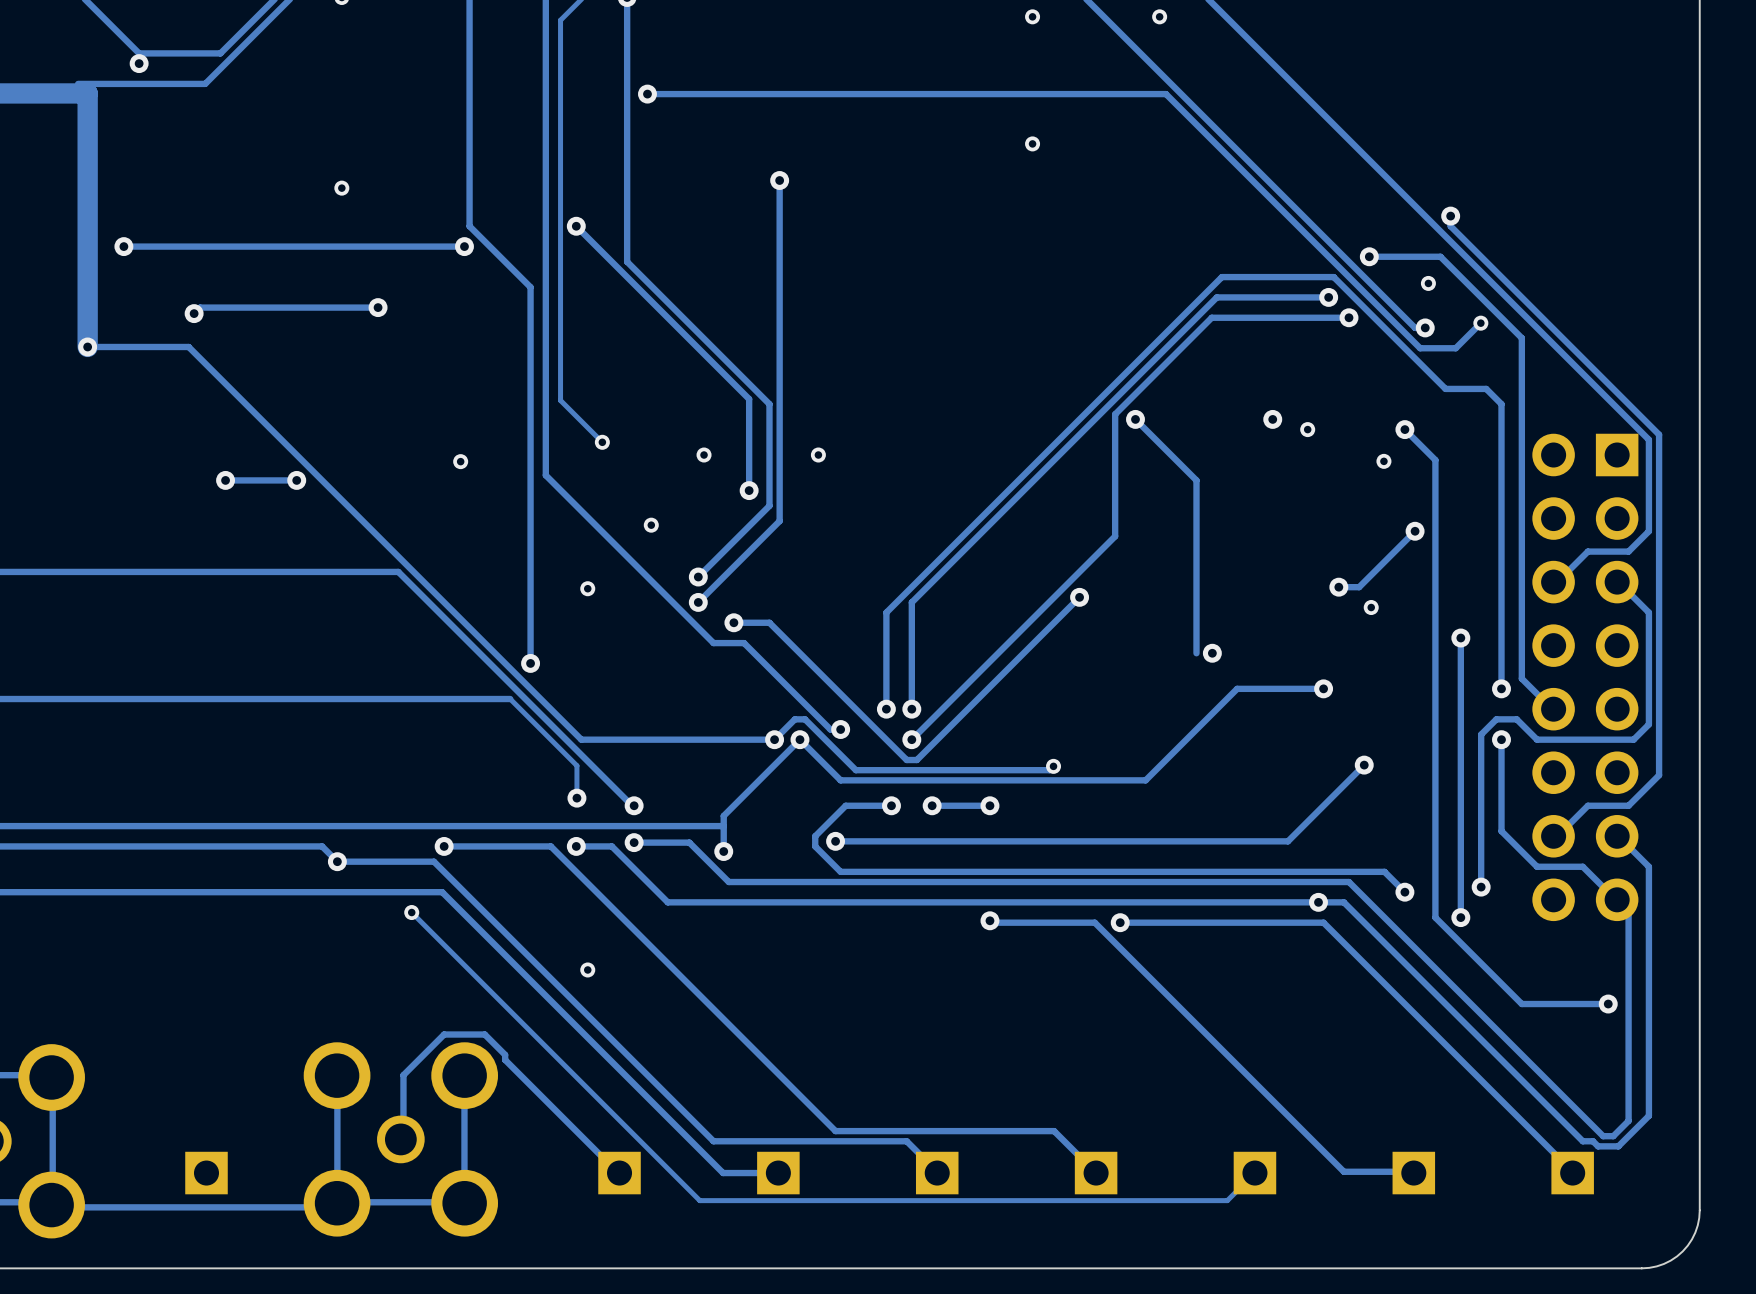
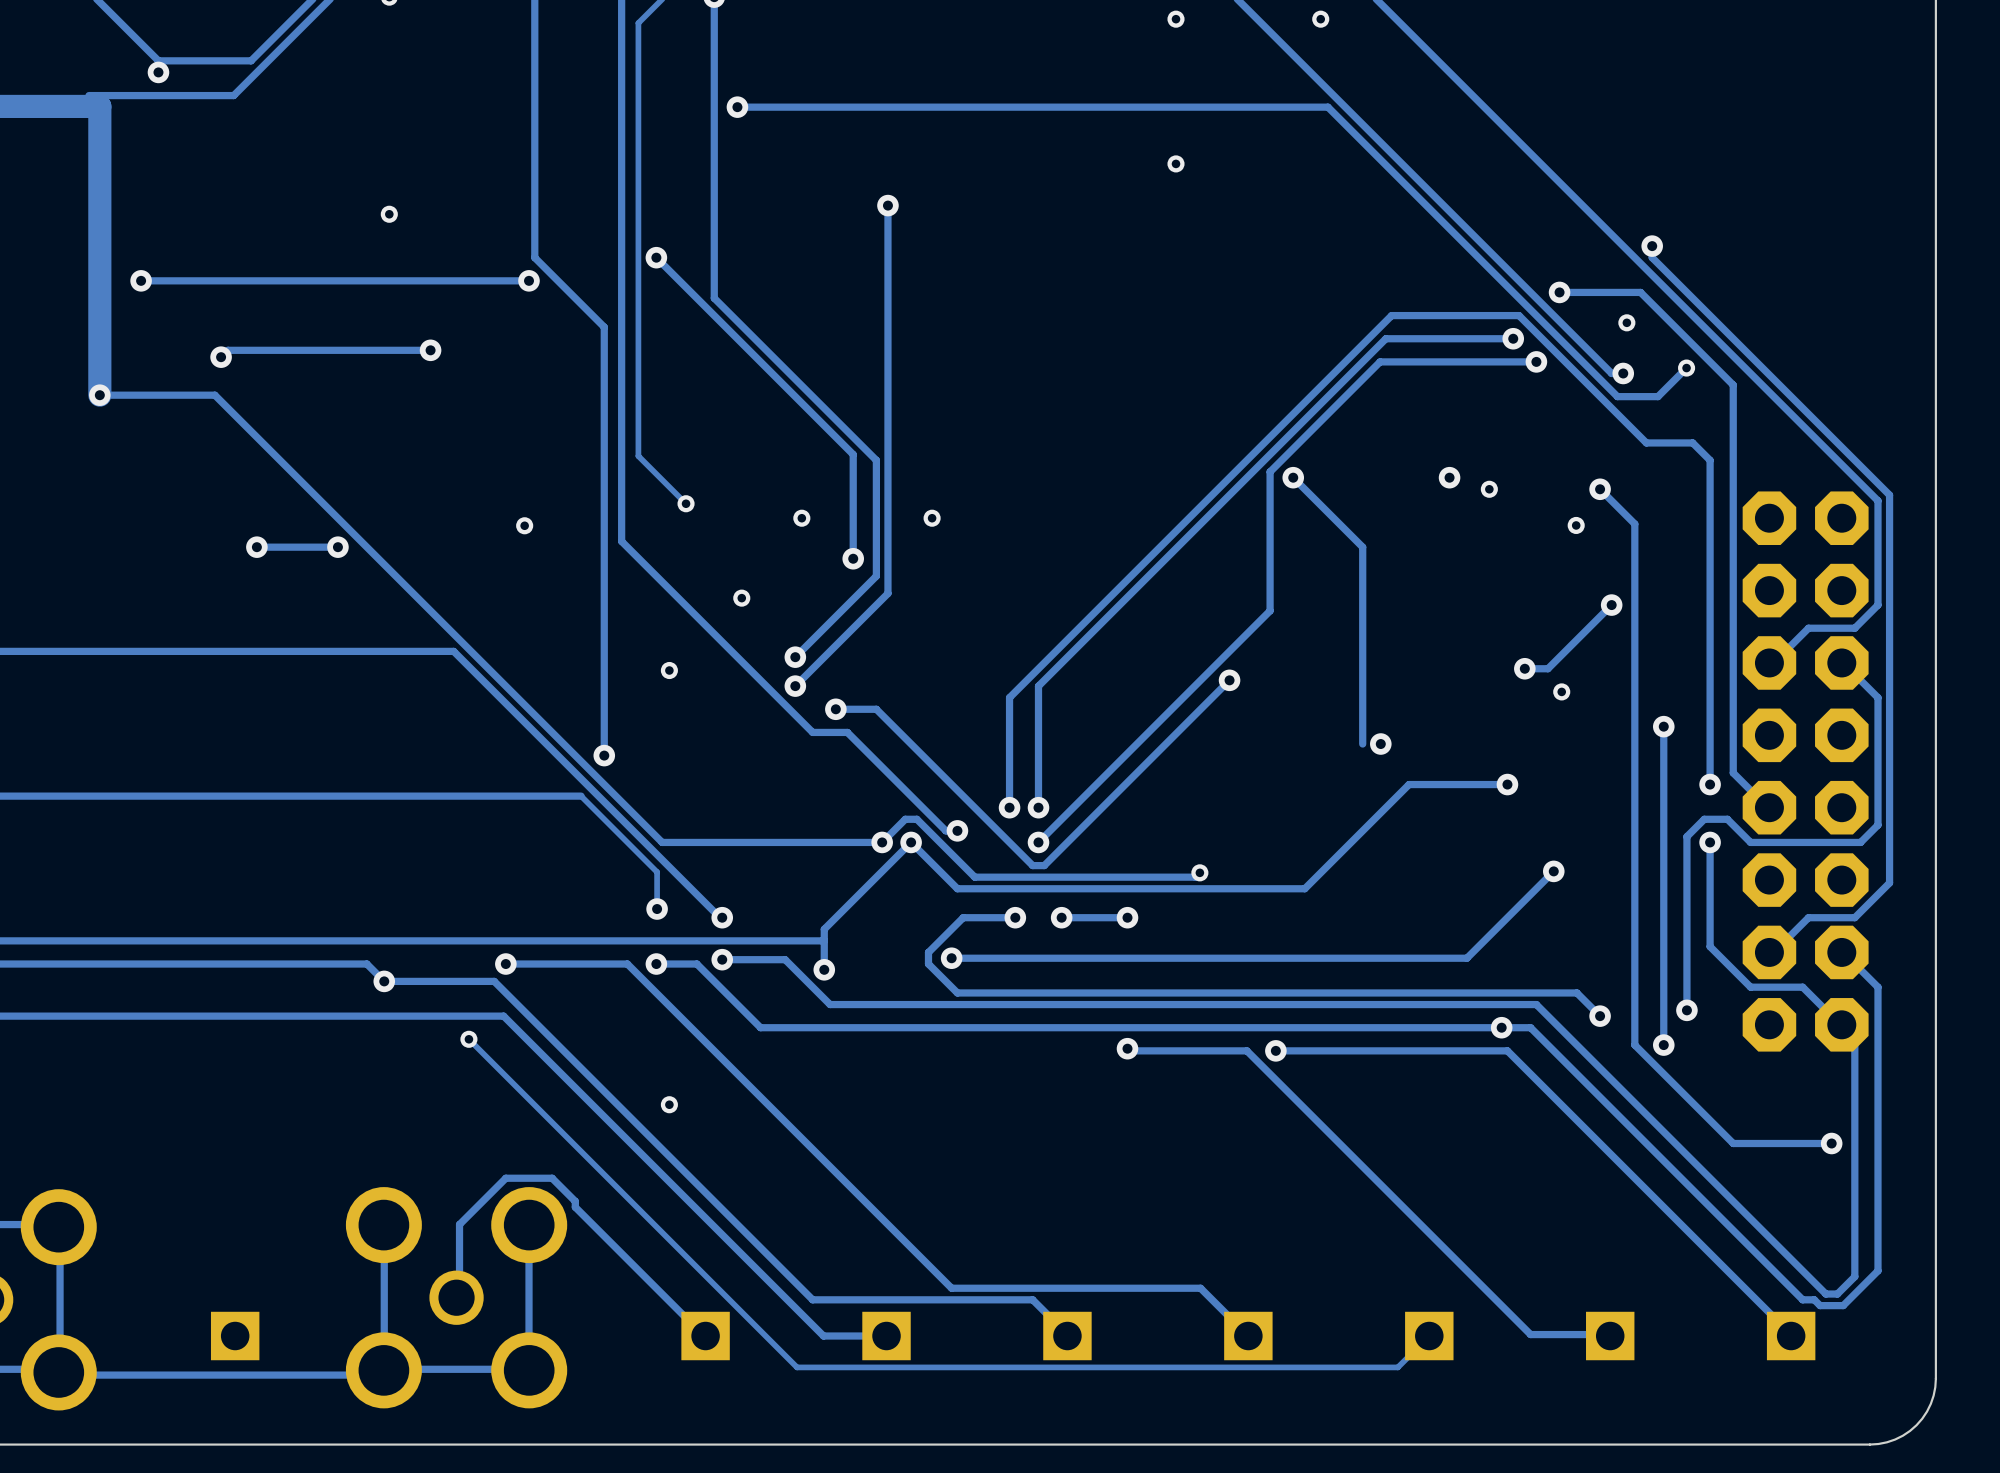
part footprint: [1532, 433, 1639, 922] -> [1742, 491, 1869, 1052]

